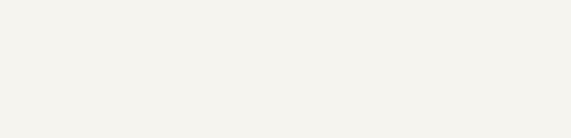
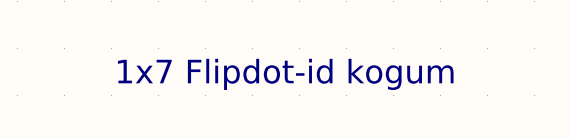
text: none -> 1x7 Flipdot-id kogum (285, 74)

